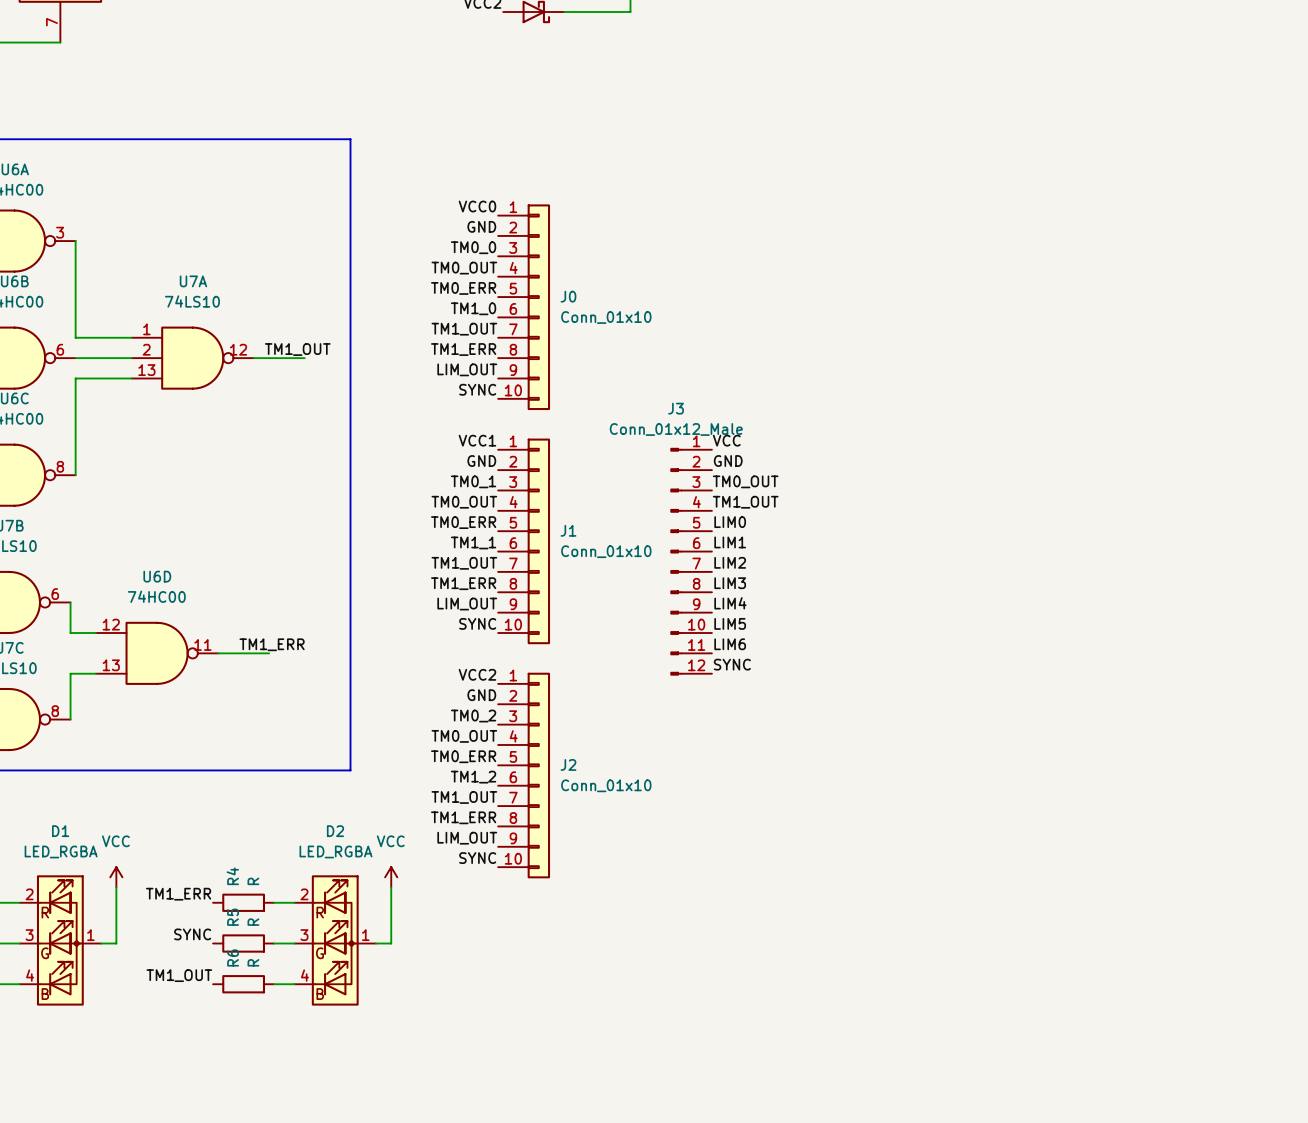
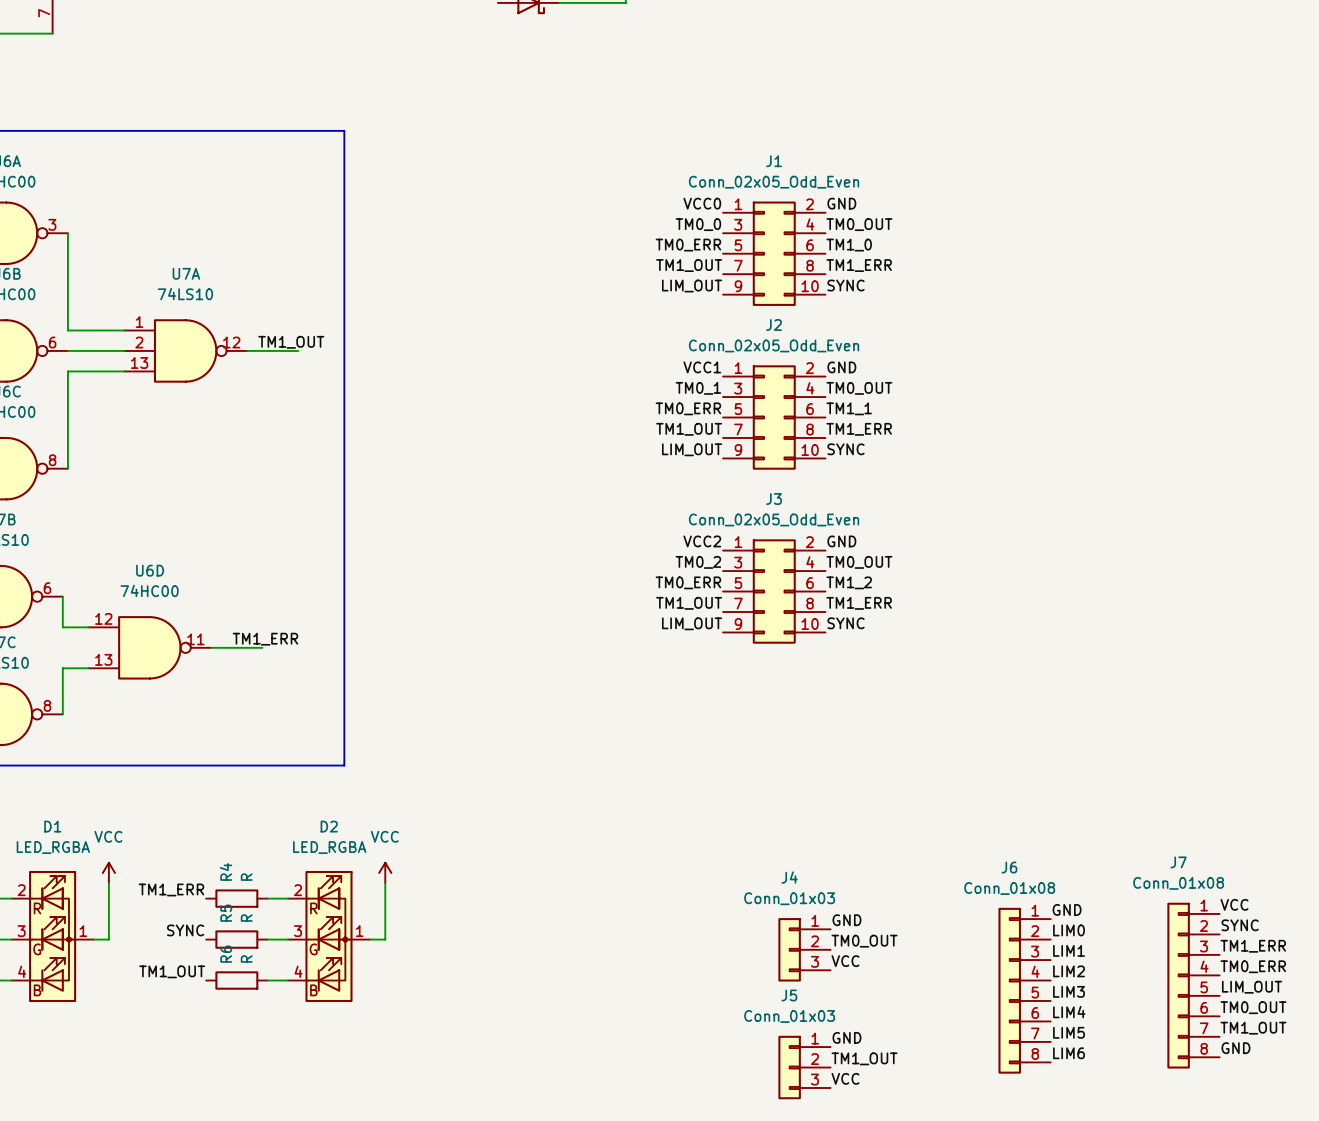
label: VCC0 (477, 206) -> none
label: none -> VCC0 (702, 203)
label: none -> GND (841, 203)
label: GND (481, 226) -> none
label: none -> TM0_0 (698, 224)
label: none -> TM0_OUT (859, 224)
label: TM0_0 (473, 247) -> none
label: none -> TM0_ERR (688, 245)
label: none -> TM1_0 (849, 245)
label: TM0_OUT (464, 268) -> none
label: none -> TM1_OUT (689, 265)
label: none -> TM1_ERR (859, 265)
label: TM0_ERR (463, 288) -> none
label: none -> LIM_OUT (692, 286)
label: none -> SYNC (846, 285)
J0: Conn_01x10 (524, 307) -> none
label: TM1_0 (473, 308) -> none
label: TM1_OUT (464, 329) -> none
label: TM1_ERR (463, 349) -> none
label: LIM_OUT (467, 369) -> none
label: none -> VCC1 (702, 367)
label: none -> GND (841, 367)
label: SYNC (477, 389) -> none
label: none -> TM0_1 (698, 388)
label: none -> TM0_OUT (859, 388)
J3 name position: J3 (676, 408) -> J3 (774, 499)
label: none -> TM0_ERR (688, 408)
label: none -> TM1_1 (849, 408)
J3 value: Conn_01x12_Male (676, 429) -> Conn_02x05_Odd_Even (774, 519)
label: none -> TM1_OUT (689, 429)
label: none -> TM1_ERR (859, 429)
J1 symbol: [498, 438, 551, 645] -> [723, 201, 826, 306]
label: VCC1 (477, 440) -> none
label: VCC (726, 440) -> none
J3 symbol: [670, 448, 712, 676] -> [723, 539, 826, 644]
label: none -> SYNC (846, 449)
label: none -> LIM_OUT (692, 449)
label: GND (481, 461) -> none
label: GND (728, 461) -> none
label: TM0_1 (473, 481) -> none
label: TM0_OUT (745, 481) -> none
label: TM0_OUT (464, 502) -> none
label: TM1_OUT (745, 502) -> none
label: TM0_ERR (463, 522) -> none
label: LIM0 (730, 522) -> none
J1 name position: J1 (568, 530) -> J1 (774, 161)
label: TM1_1 (473, 542) -> none
label: LIM1 (730, 542) -> none
label: none -> VCC2 (702, 541)
label: none -> GND (841, 541)
J1 value: Conn_01x10 (606, 551) -> Conn_02x05_Odd_Even (774, 182)
label: LIM2 (730, 562) -> none
label: TM1_OUT (464, 563) -> none
label: none -> TM0_2 (698, 562)
label: none -> TM0_OUT (859, 562)
label: TM1_ERR (463, 583) -> none
label: LIM3 (730, 583) -> none
label: none -> TM0_ERR (688, 582)
label: none -> TM1_2 (849, 582)
label: LIM4 (730, 603) -> none
label: LIM_OUT (467, 604) -> none
label: none -> TM1_OUT (689, 603)
label: none -> TM1_ERR (859, 603)
label: SYNC (477, 623) -> none
label: LIM5 (730, 623) -> none
label: none -> LIM_OUT (692, 623)
label: none -> SYNC (846, 623)
label: LIM6 (730, 644) -> none
label: SYNC (732, 664) -> none
J2 symbol: [498, 672, 551, 879] -> [723, 365, 826, 470]
label: VCC2 (477, 674) -> none
label: GND (481, 695) -> none
label: TM0_2 (473, 716) -> none
label: TM0_OUT (464, 736) -> none
label: TM0_ERR (463, 756) -> none
J2 name position: J2 (568, 764) -> J2 (774, 324)
label: TM1_2 (473, 777) -> none
J2 value: Conn_01x10 (606, 785) -> Conn_02x05_Odd_Even (774, 345)
label: TM1_OUT (464, 797) -> none
label: TM1_ERR (463, 817) -> none
label: LIM_OUT (467, 838) -> none
label: SYNC (477, 858) -> none
label: none -> VCC (1234, 904)
label: none -> GND (1067, 909)
label: none -> GND (846, 920)
label: none -> SYNC (1240, 925)
label: none -> LIM0 (1069, 930)
label: none -> TM0_OUT (864, 941)
label: none -> TM1_ERR (1253, 946)
J4: none -> Conn_01x03 (804, 949)
label: none -> LIM1 (1069, 950)
label: none -> VCC (845, 961)
label: none -> TM0_ERR (1253, 966)
label: none -> LIM2 (1069, 971)
J7: none -> Conn_01x08 (1193, 985)
label: none -> LIM_OUT (1252, 987)
J6: none -> Conn_01x08 (1024, 990)
label: none -> LIM3 (1069, 991)
label: none -> TM0_OUT (1253, 1007)
label: none -> LIM4 (1069, 1012)
label: none -> TM1_OUT (1253, 1028)
label: none -> LIM5 (1069, 1032)
label: none -> GND (846, 1037)
label: none -> GND (1235, 1048)
label: none -> LIM6 (1069, 1053)
label: none -> TM1_OUT (864, 1058)
J5: none -> Conn_01x03 (804, 1067)
label: none -> VCC (845, 1078)

